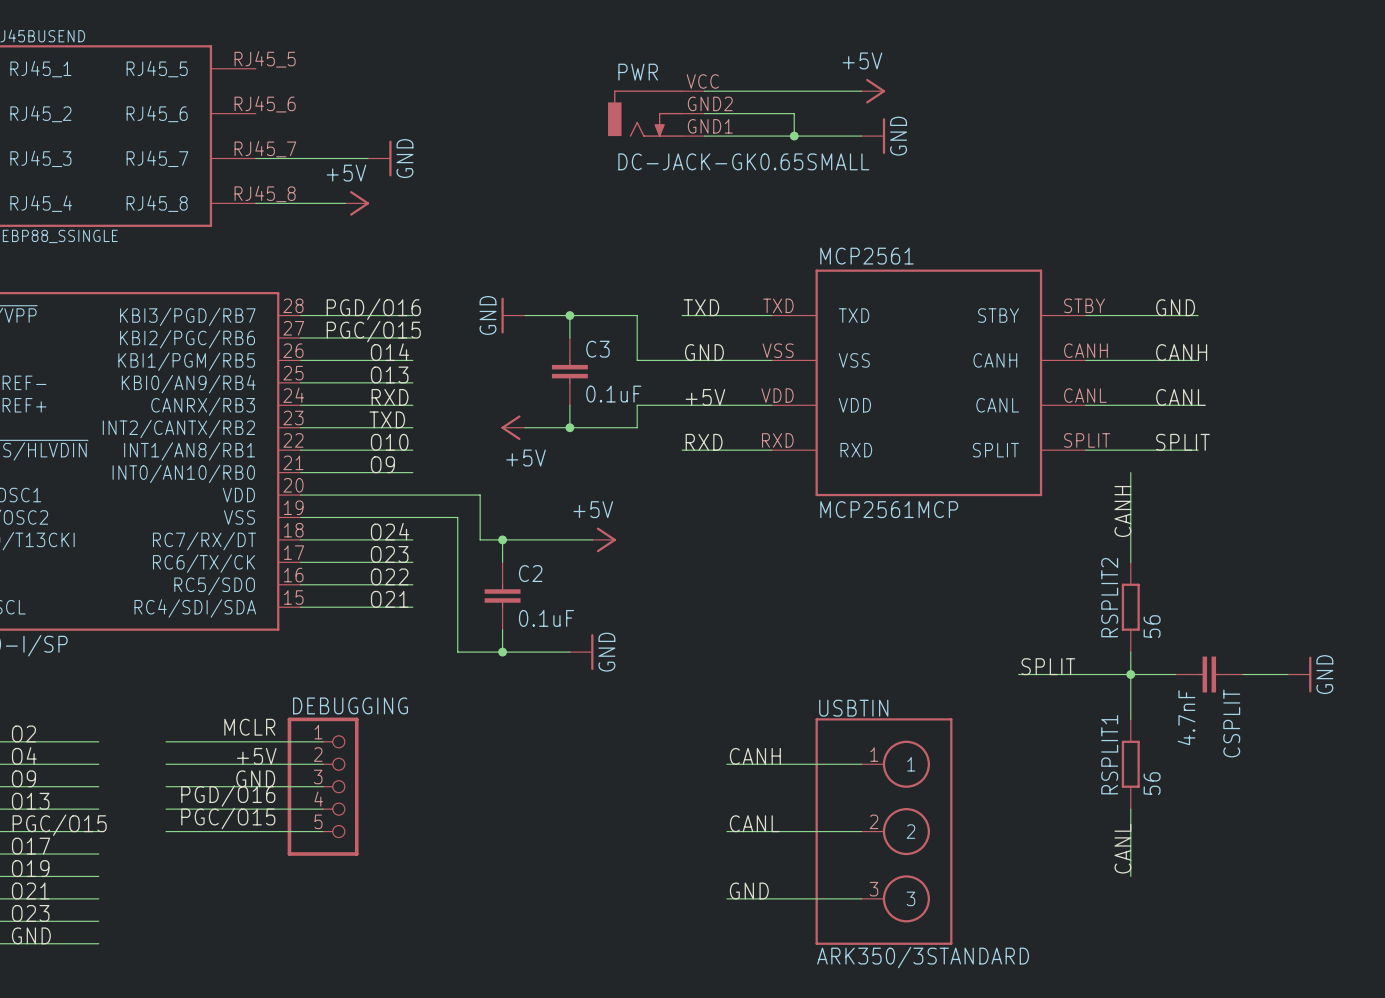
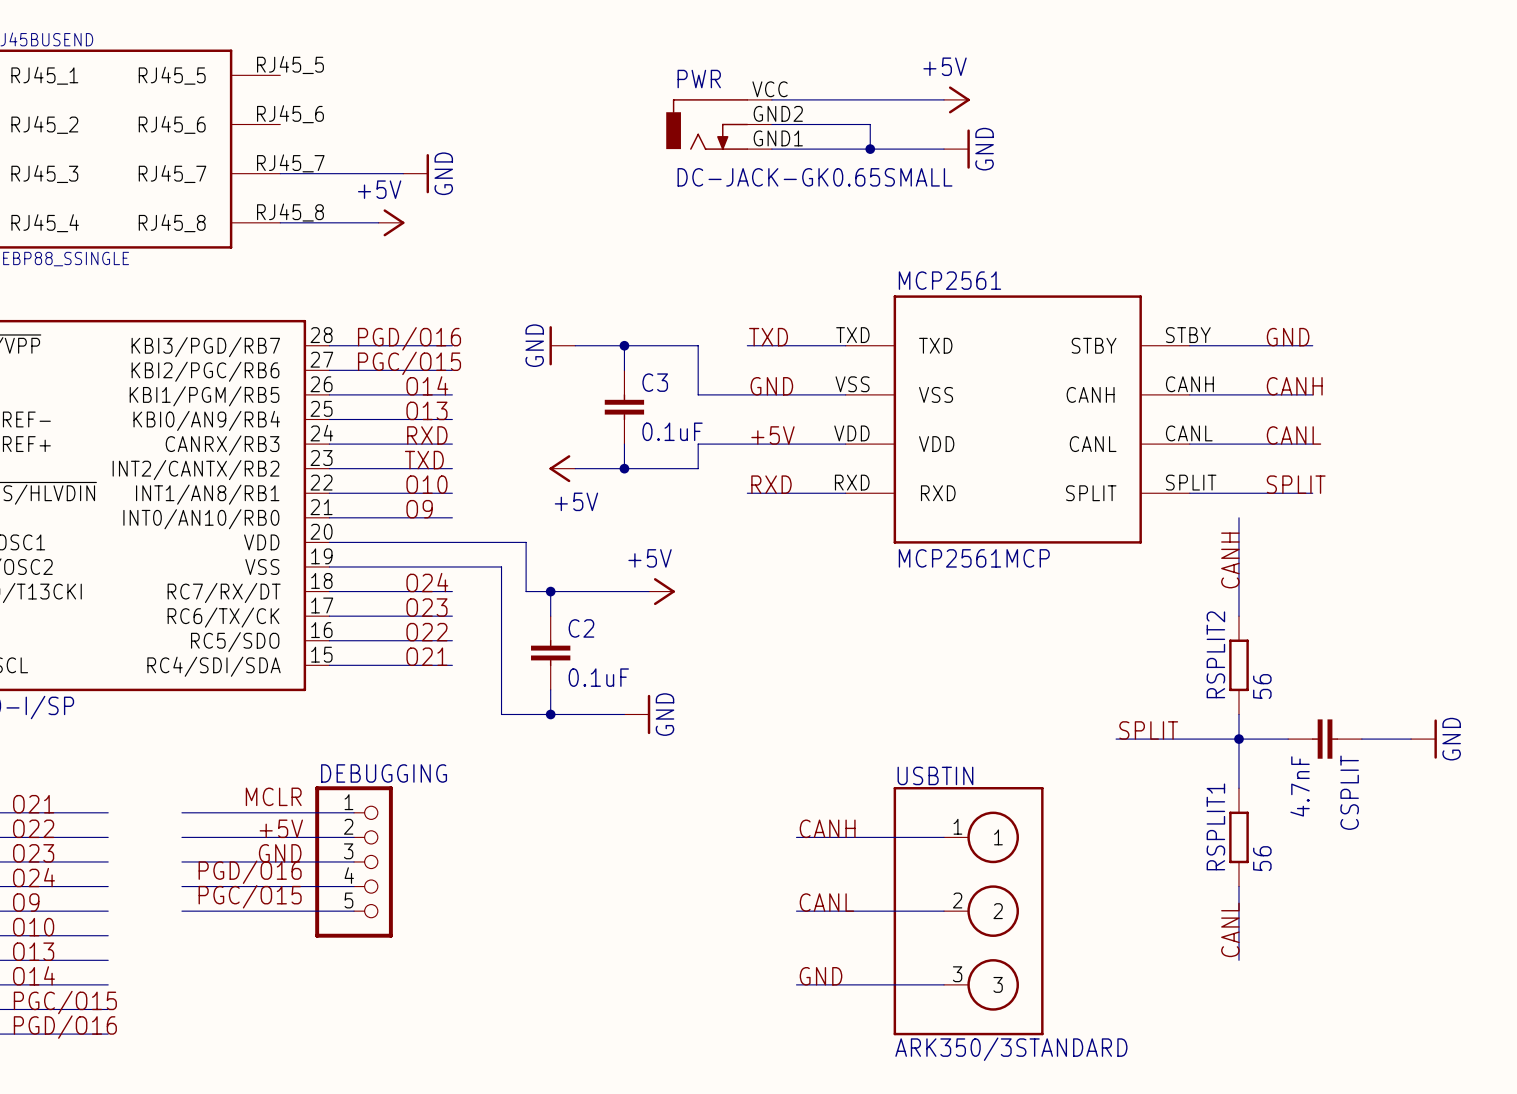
label: O2 (23, 733) -> O21 (33, 804)
label: O4 (24, 756) -> O22 (33, 828)
label: O9 (23, 778) -> O23 (33, 853)
label: O13 (30, 801) -> O24 (34, 877)
label: PGC/O15 (59, 825) -> O9 (26, 902)
label: O17 (31, 846) -> O10 (33, 927)
label: O19 (30, 868) -> O13 (33, 951)
label: O21 (30, 891) -> O14 (34, 975)
label: O23 (30, 913) -> PGC/O15 (65, 1002)
label: GND (31, 935) -> PGD/O16 (65, 1027)

